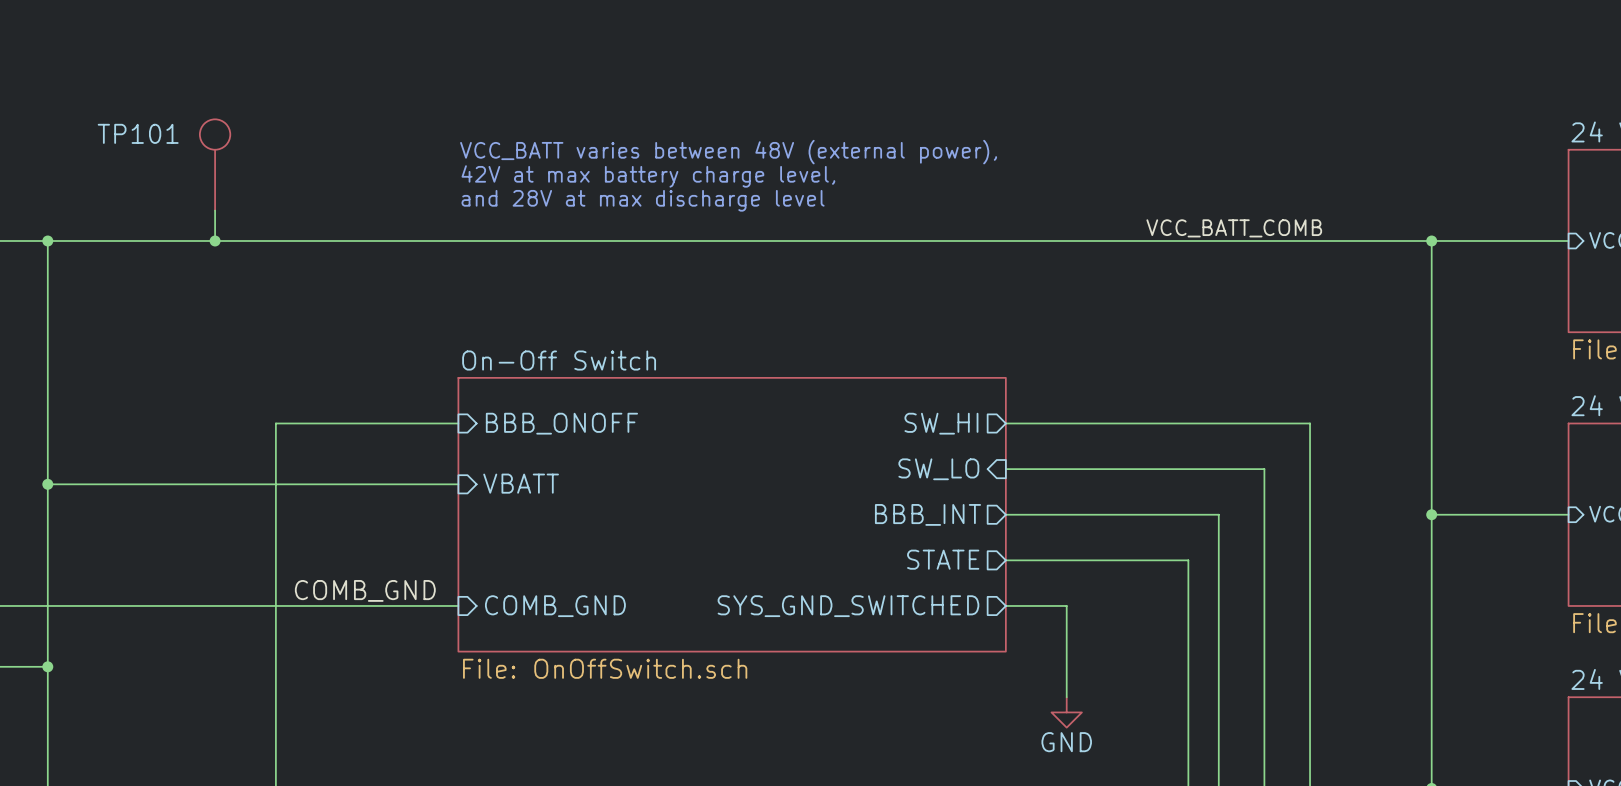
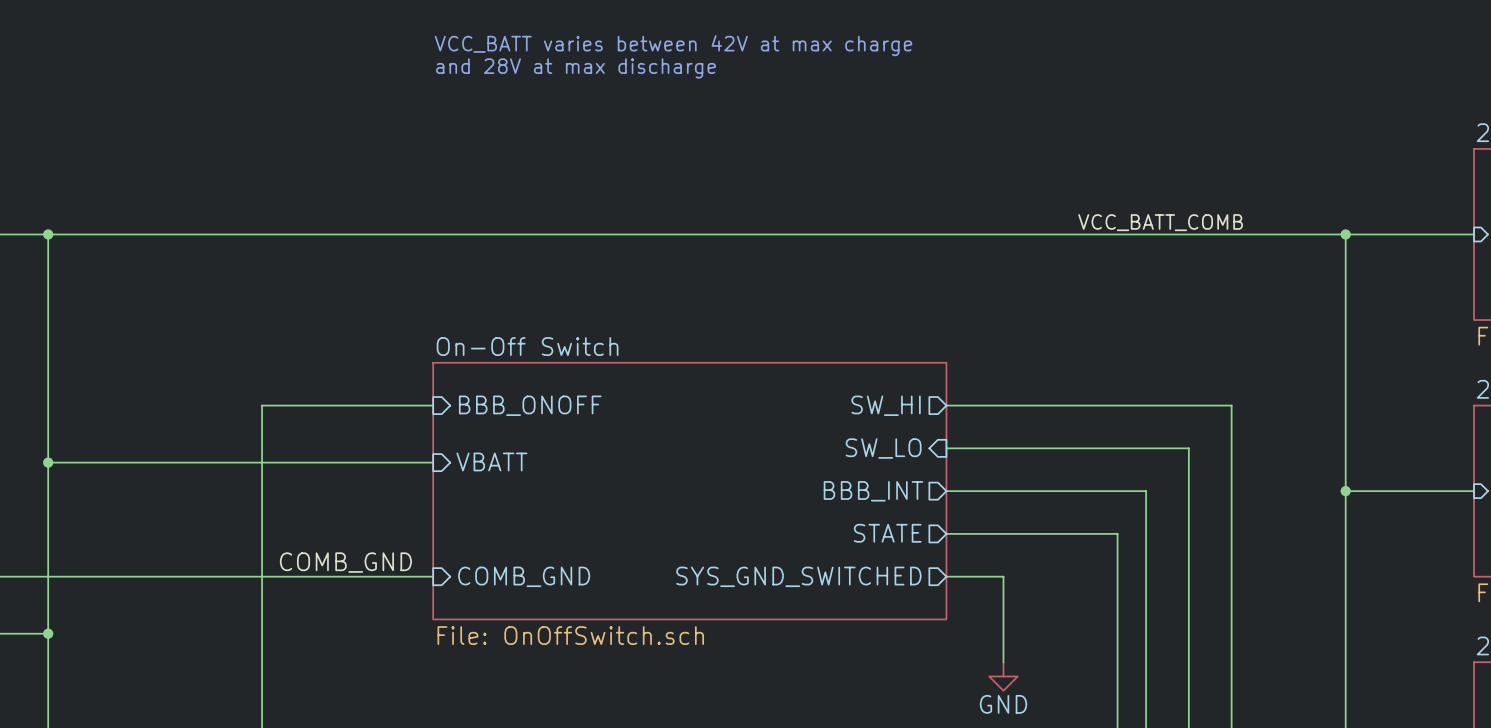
text: none -> VCC_BATT varies between 42V at max charge (673, 45)
text: none -> and 28V at max discharge (576, 68)
text: VCC_BATT varies between 48V (external power), (728, 152) -> none
TP101: (215, 164) -> none
text: 42V at max battery charge level, (648, 176) -> none
text: and 28V at max discharge level (643, 200) -> none
wire: (215, 210) (215, 240) -> none
junction: (215, 240) -> none

